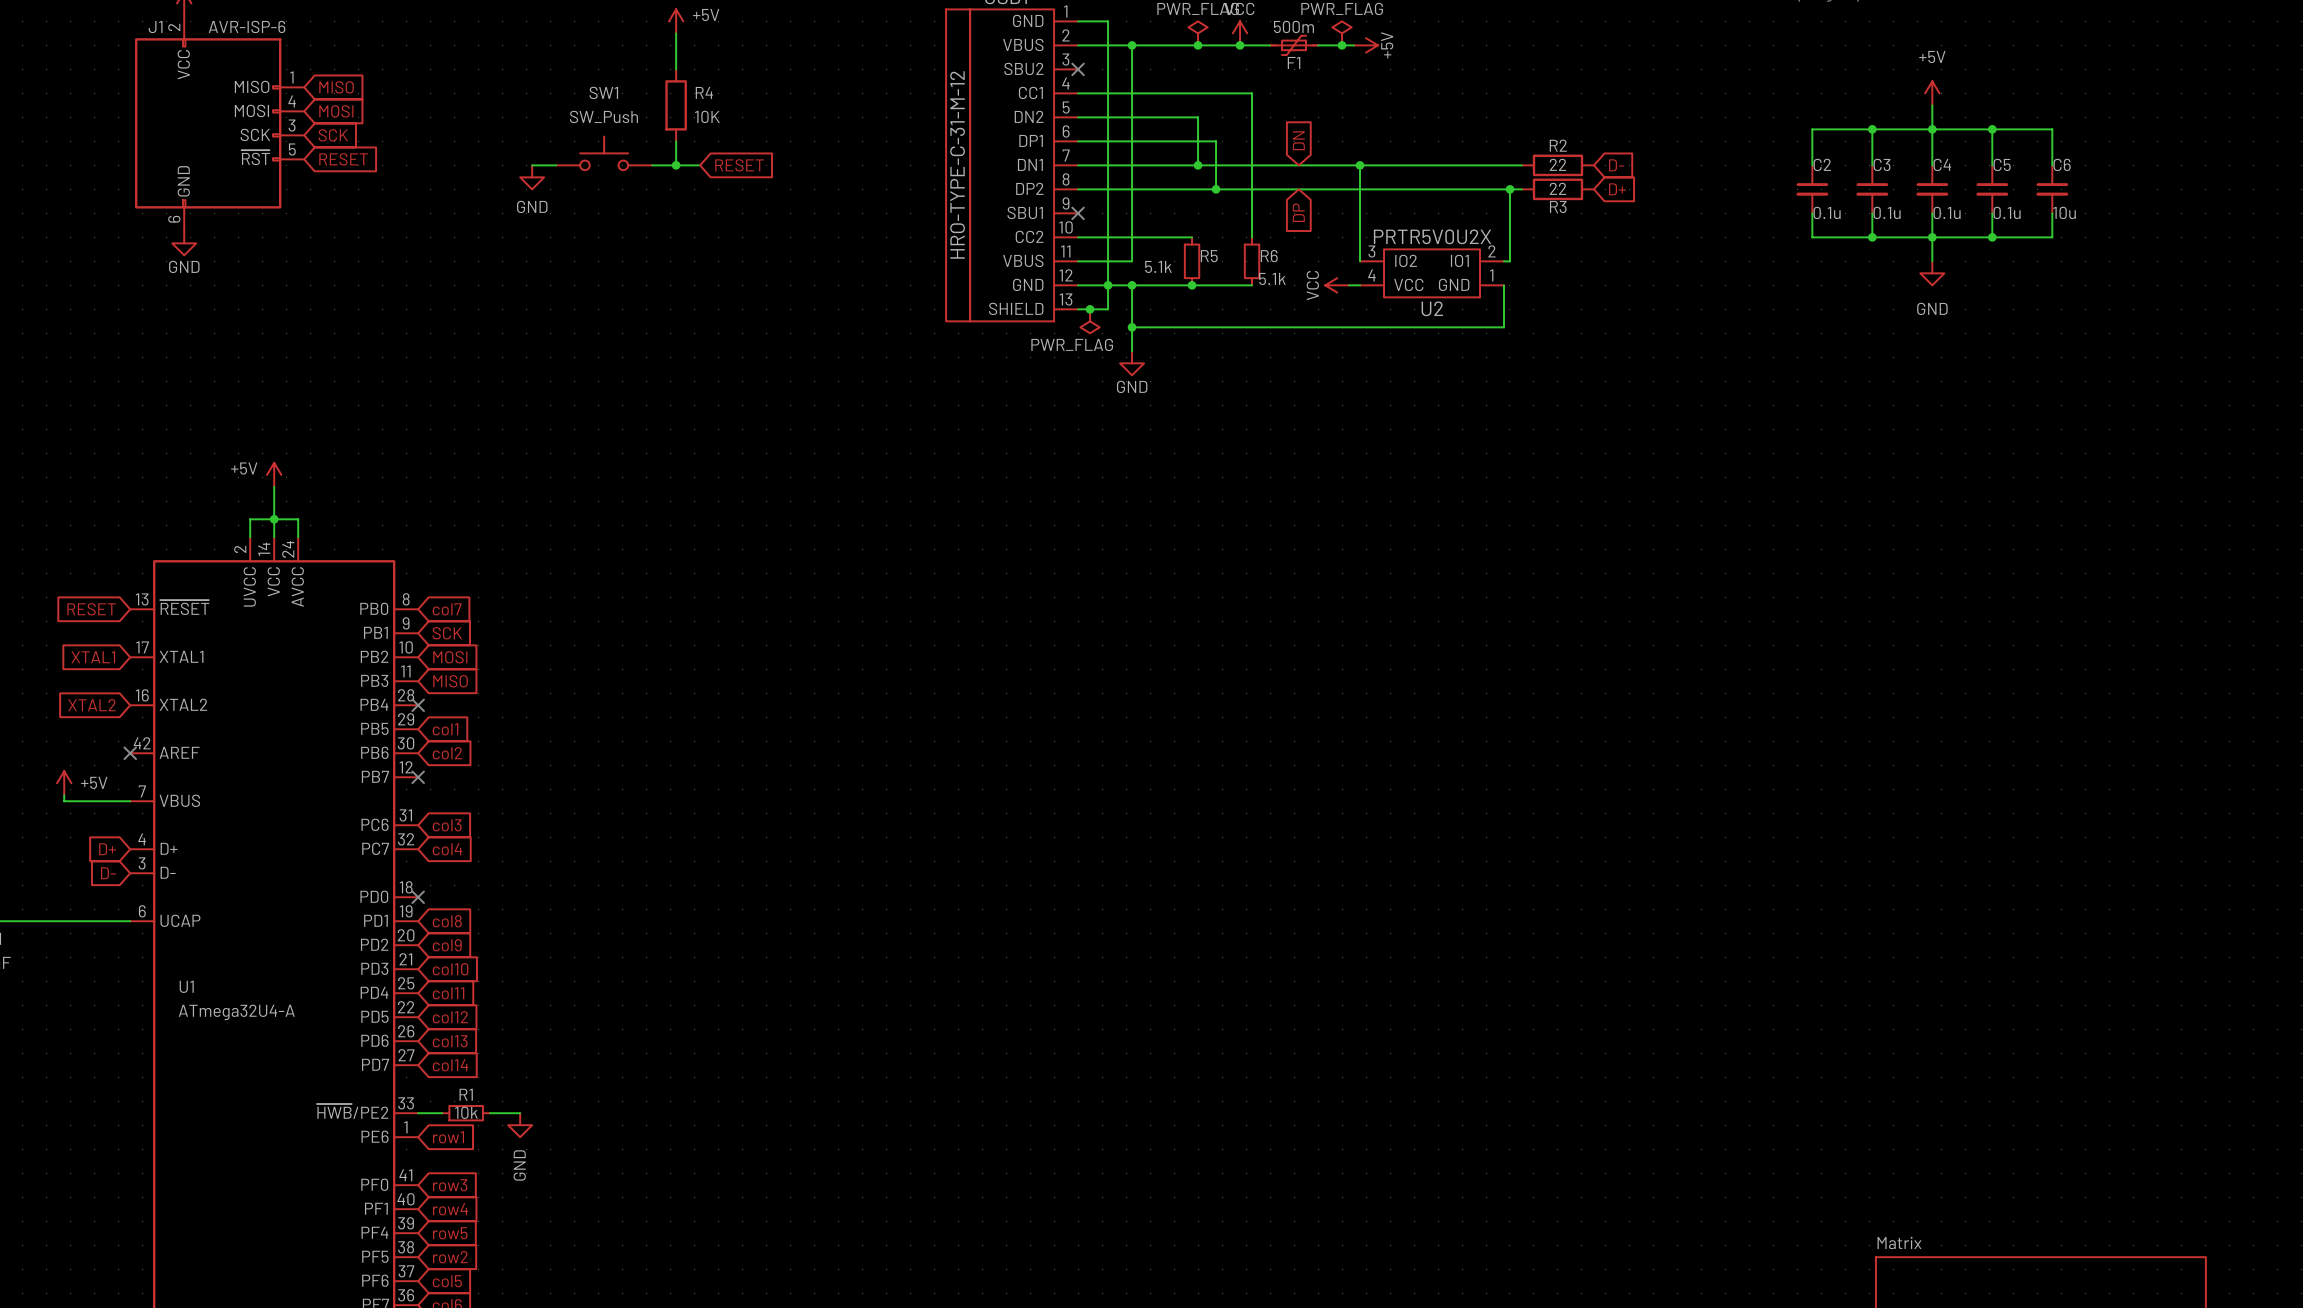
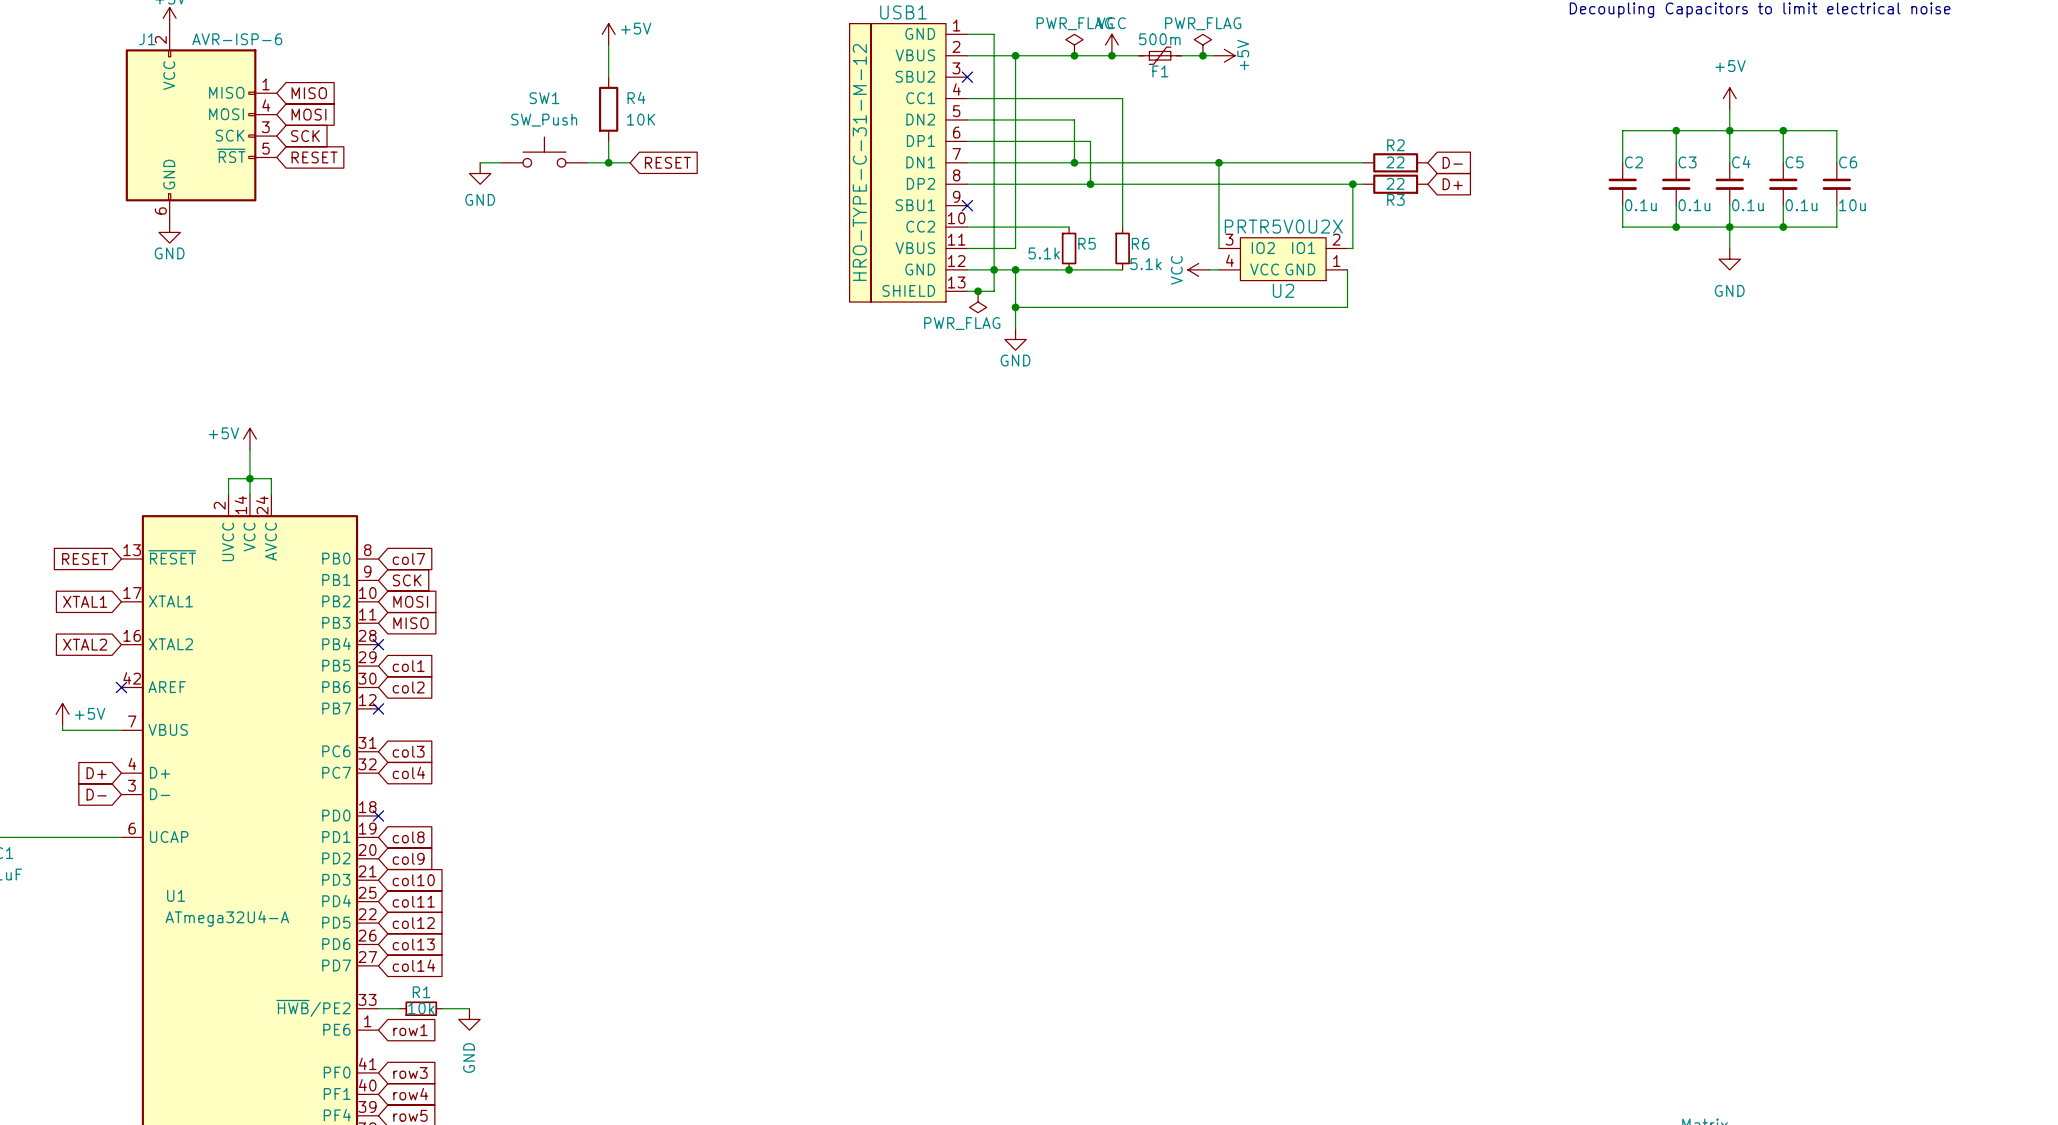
global label: DN (1298, 140) -> none
global label: DP (1298, 212) -> none

